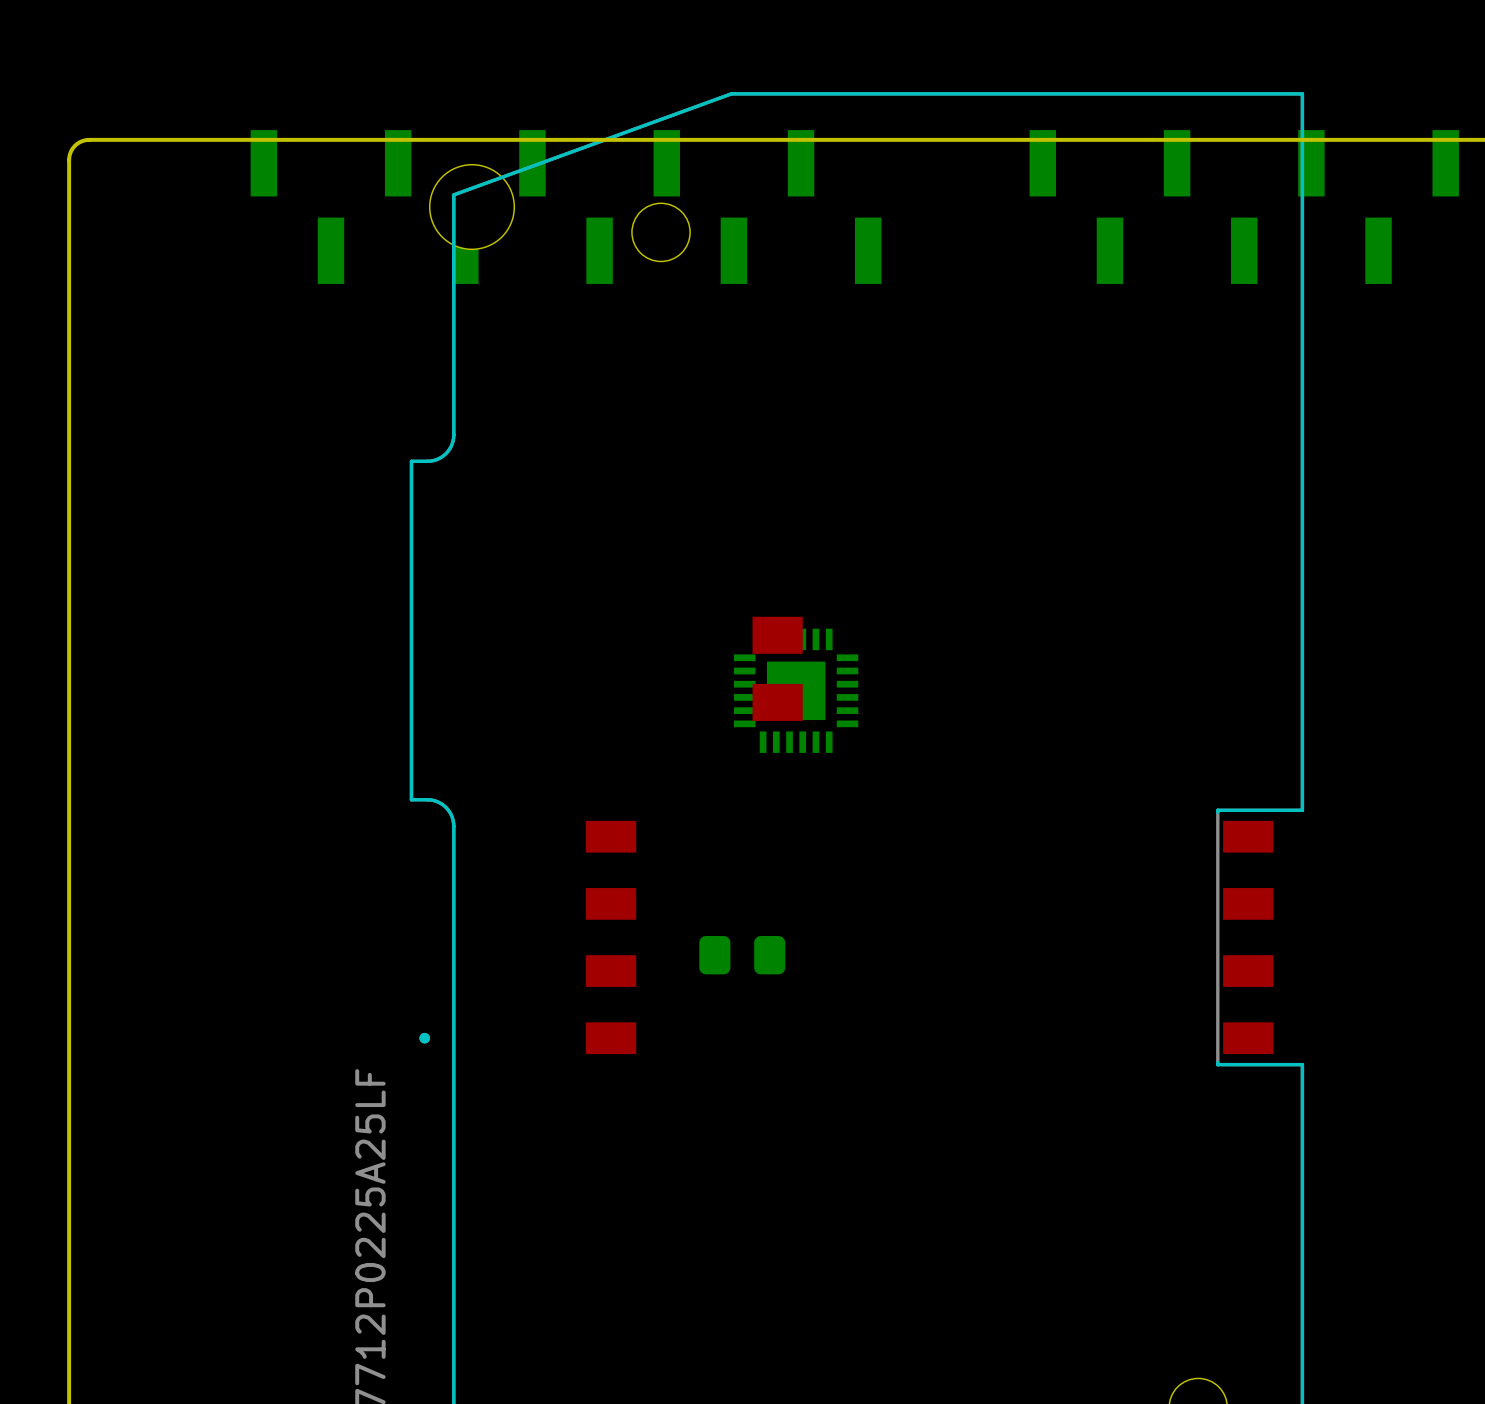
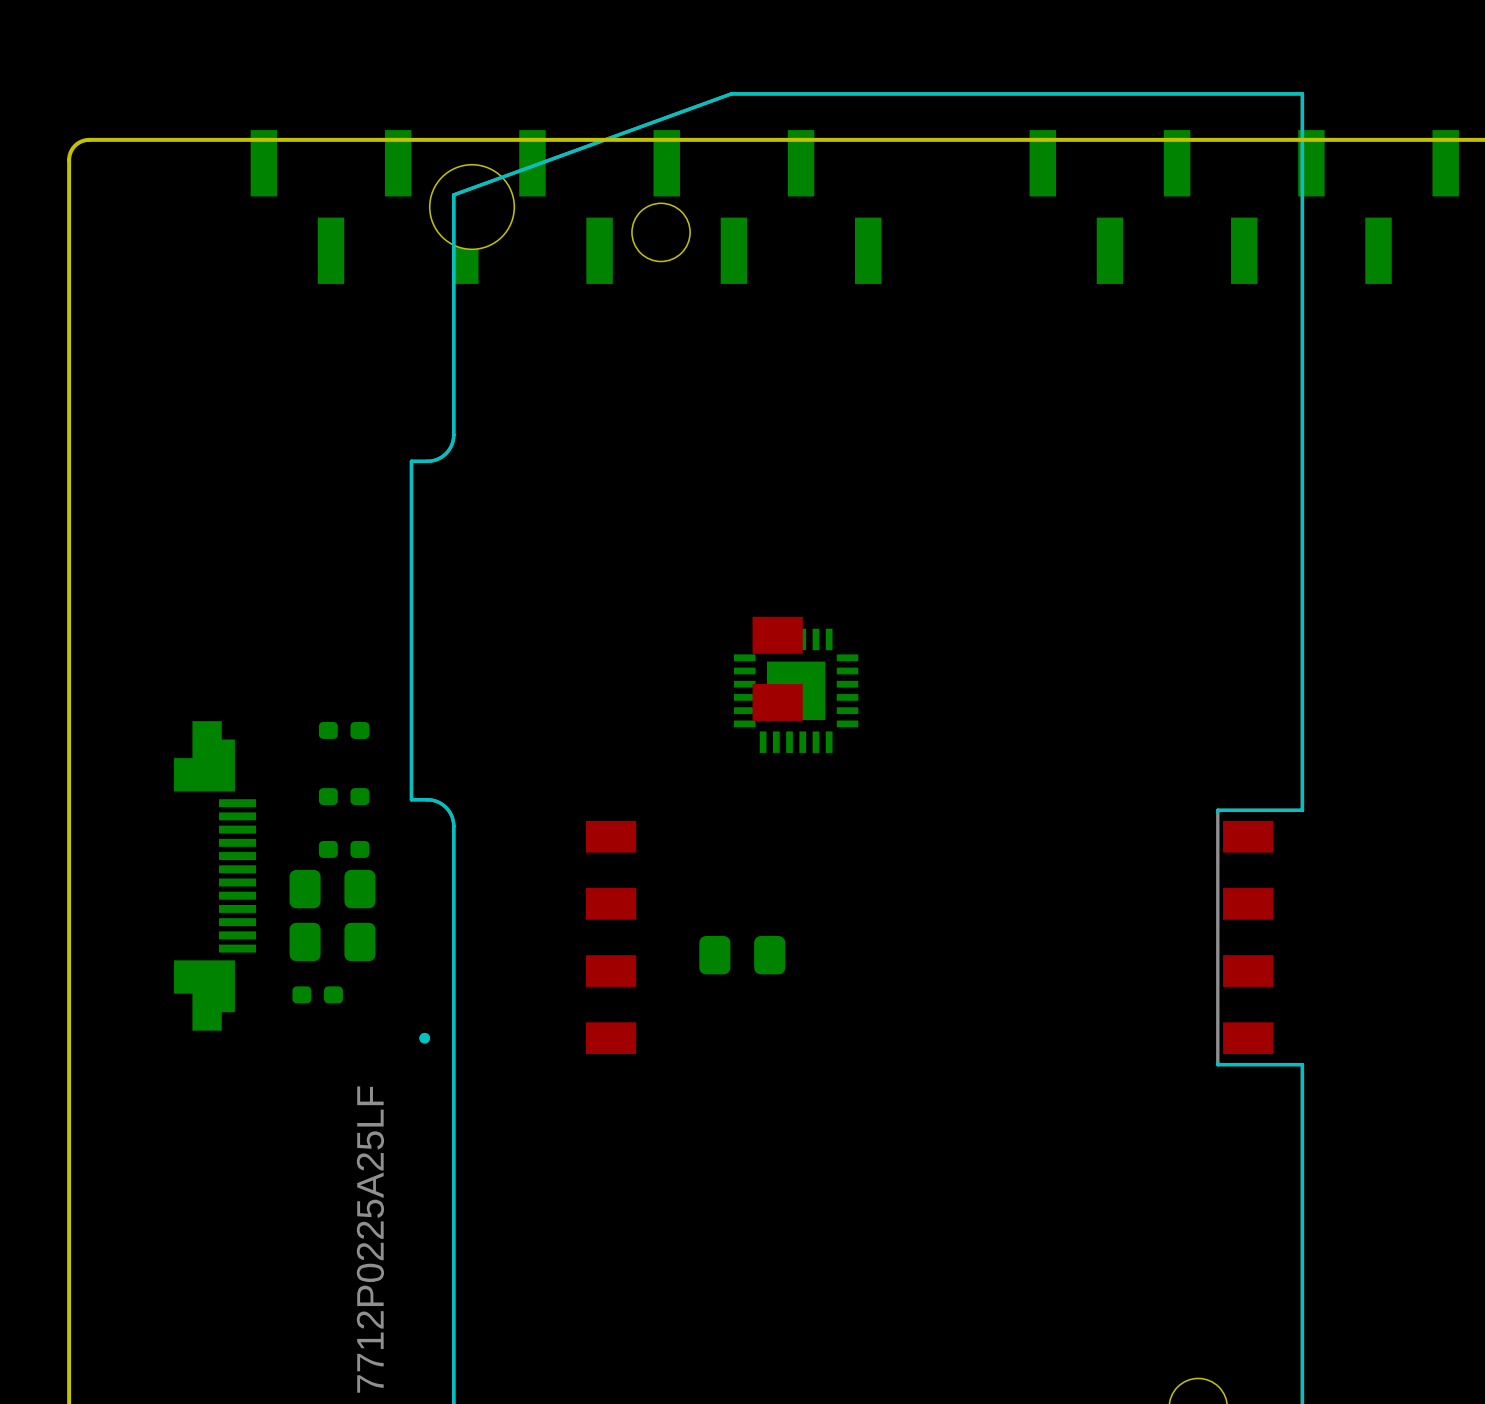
part: none -> (344, 730)
part: none -> (344, 796)
part: none -> (344, 849)
part: none -> (214, 875)
part: none -> (332, 889)
part: none -> (332, 941)
part: none -> (317, 994)

